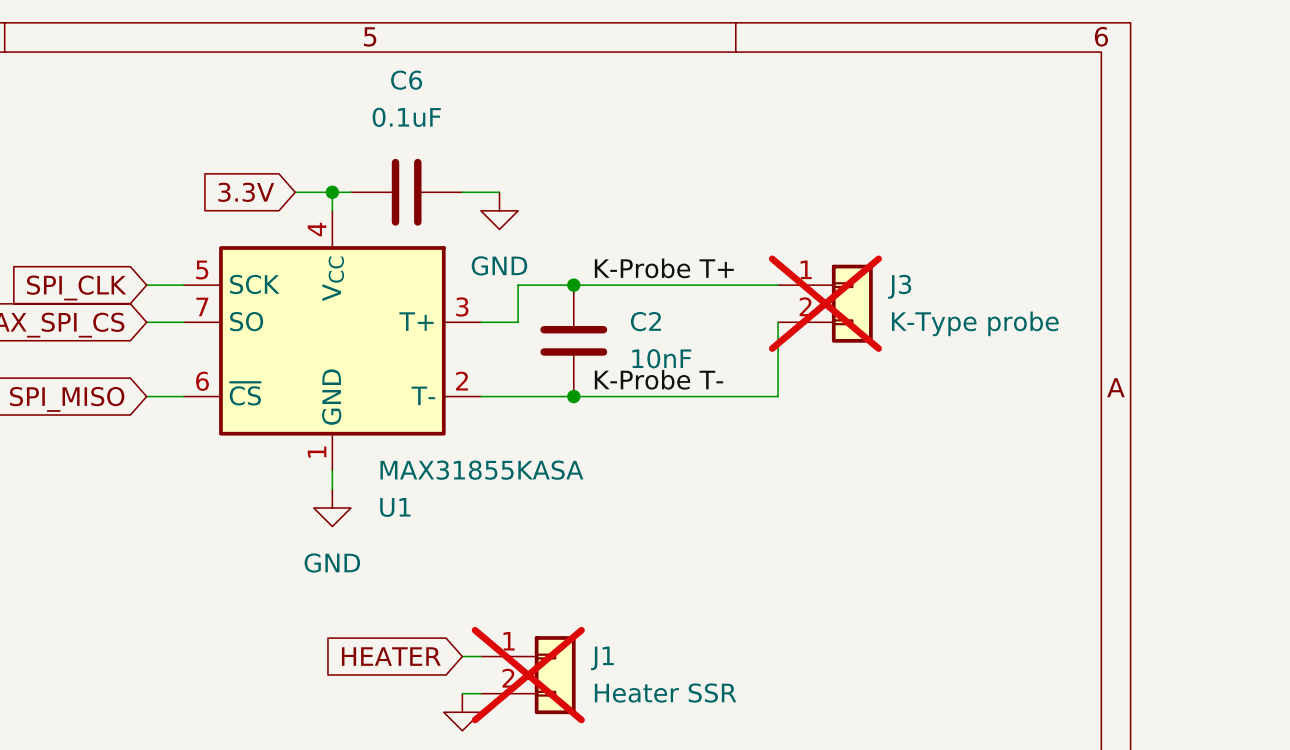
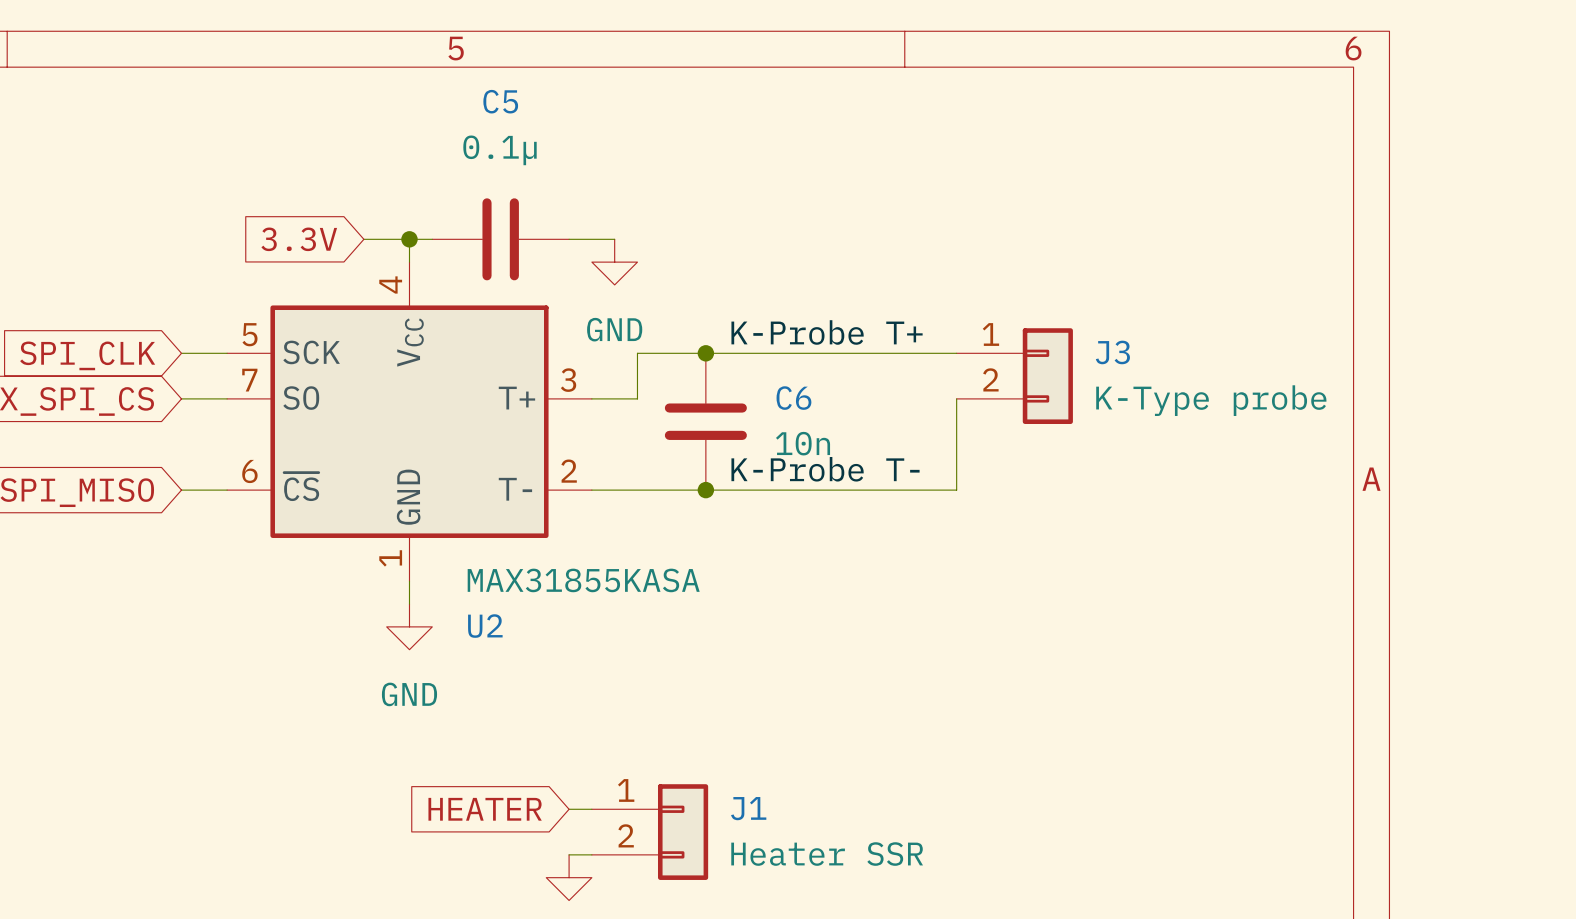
C6 name: C6 (406, 80) -> C5 (500, 101)
C6 value: 0.1uF (406, 117) -> 0.1µ (499, 150)
J3 do-not-place cross: (825, 303) -> none
C2 name: C2 (645, 321) -> C6 (793, 398)
C2 value: 10nF (661, 358) -> 10n (803, 443)
U1 name: U1 (395, 507) -> U2 (485, 626)
J1 do-not-place cross: (528, 675) -> none

